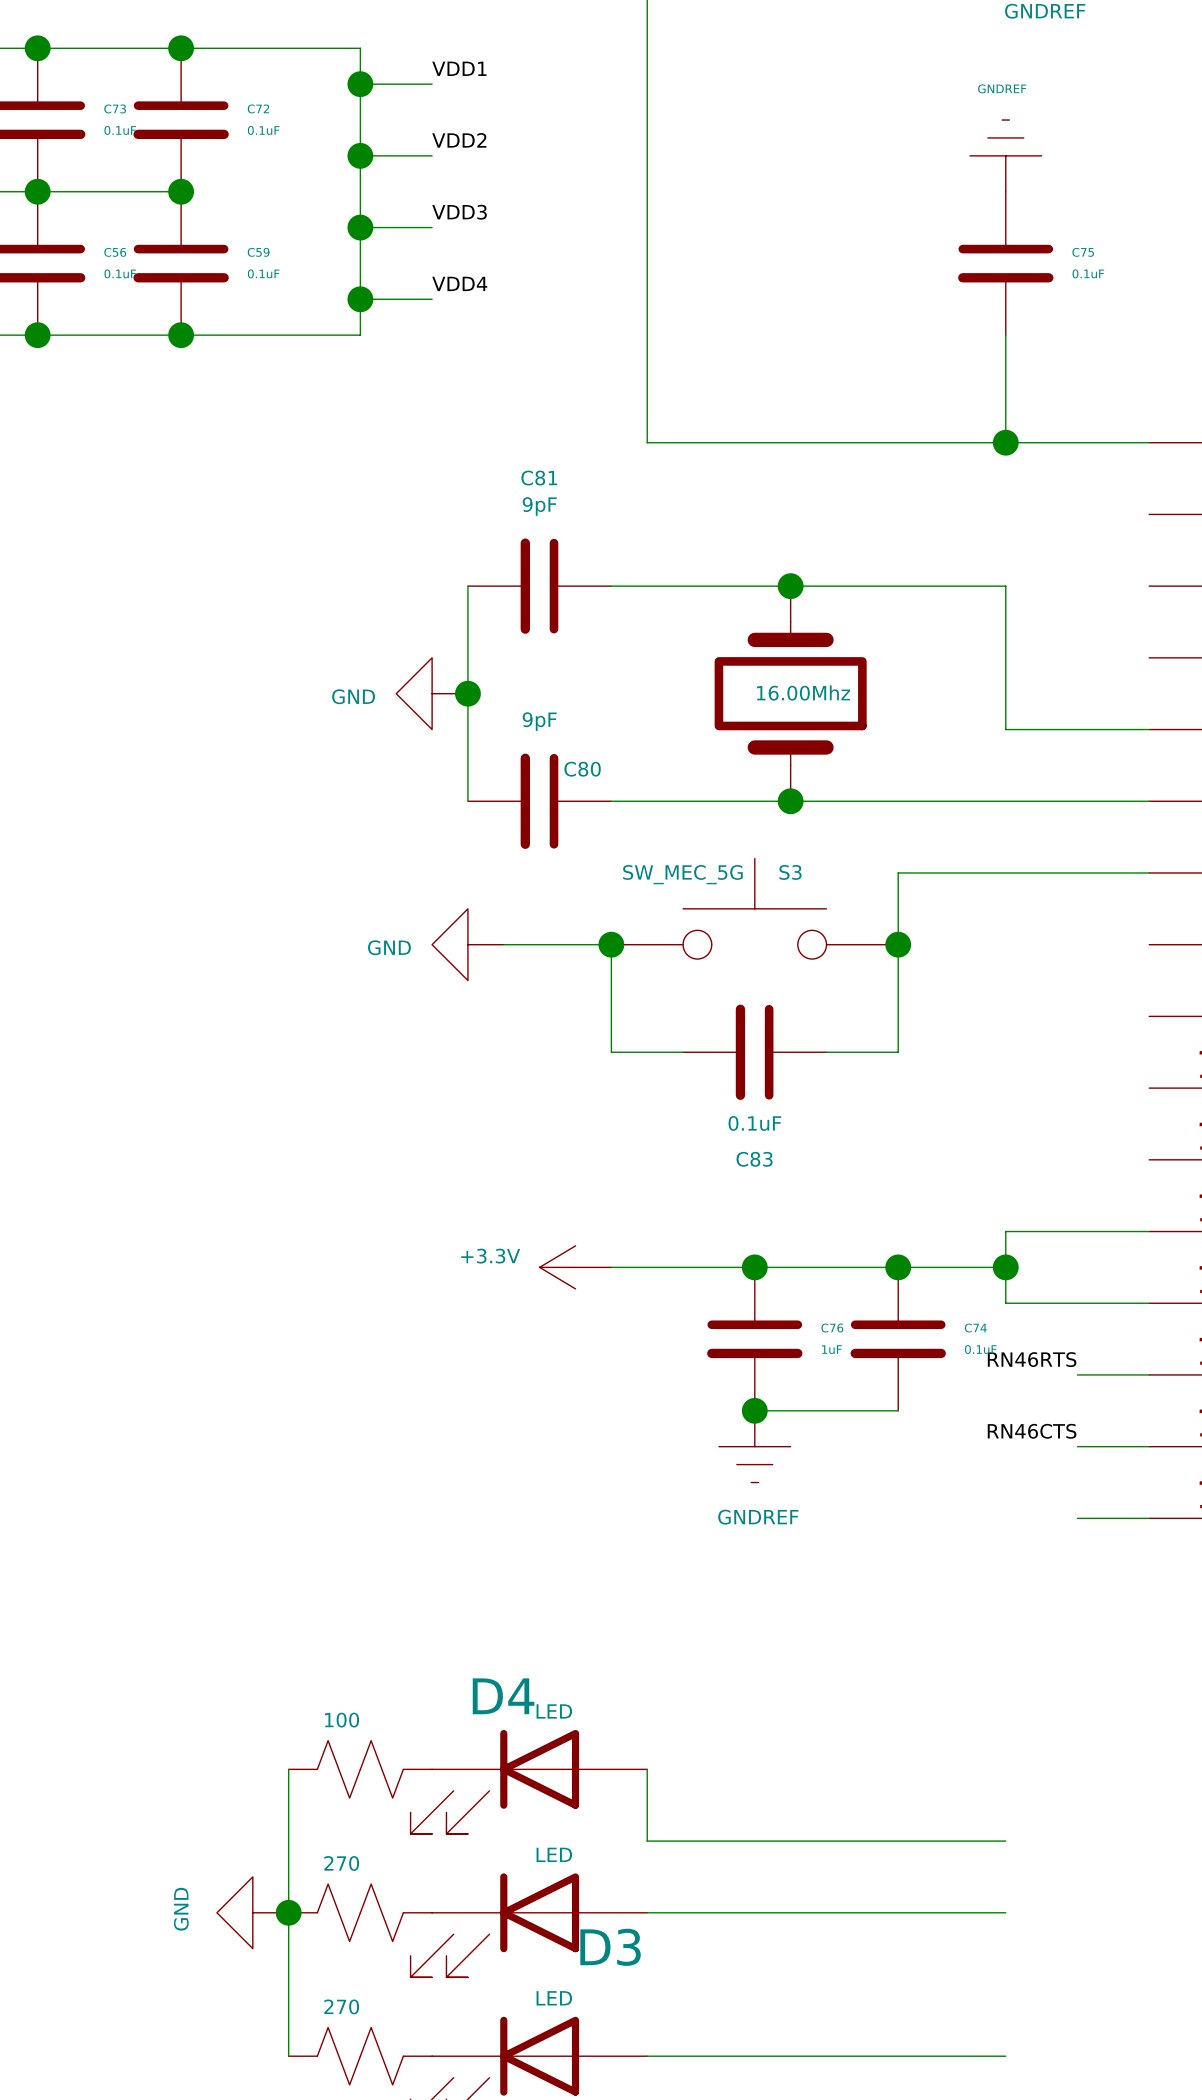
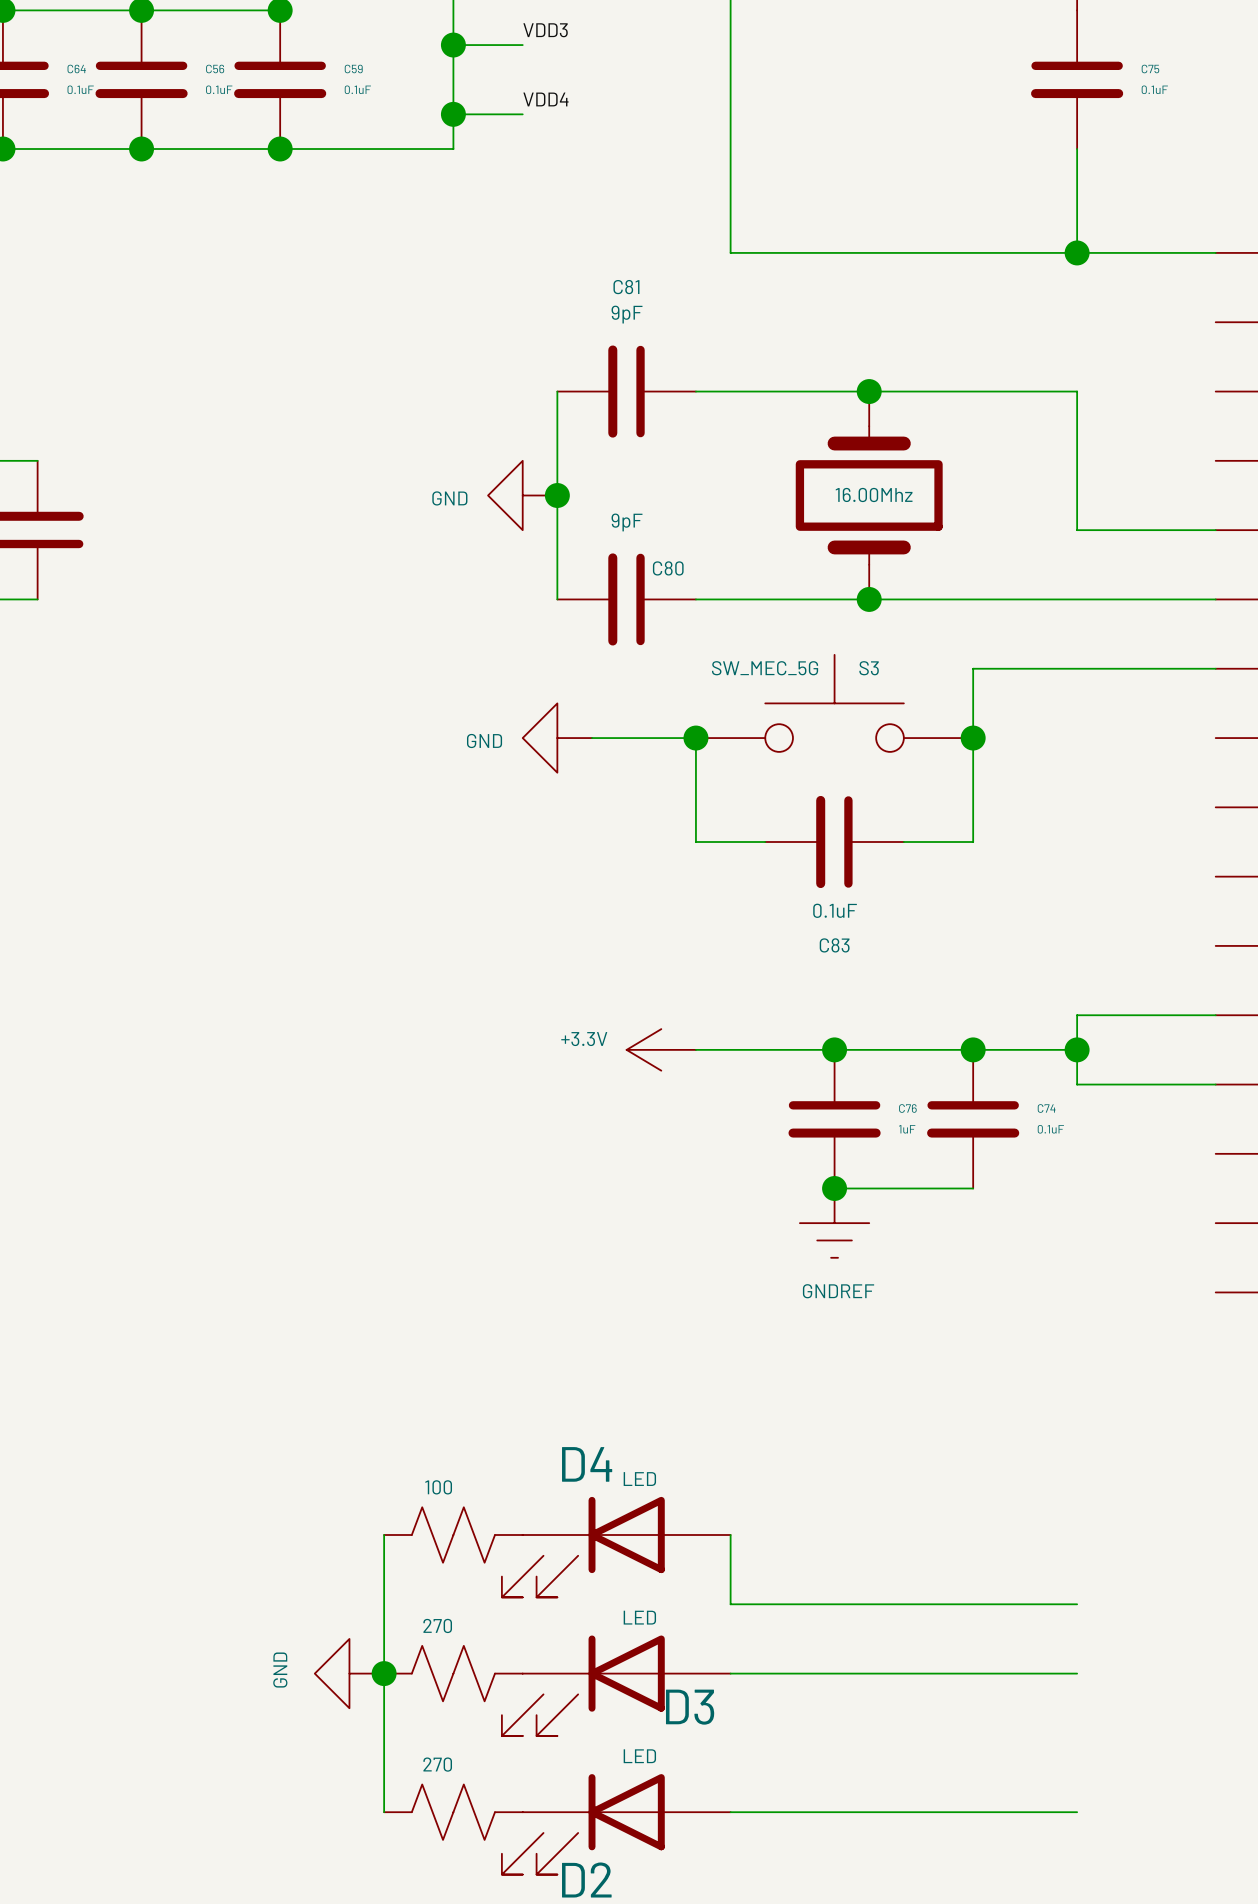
label: RN46RTS (1032, 1359) -> none
wire: (1077, 1374) (1149, 1374) -> none
label: RN46CTS (1032, 1431) -> none
wire: (1077, 1446) (1149, 1446) -> none
wire: (1077, 1518) (1149, 1518) -> none

